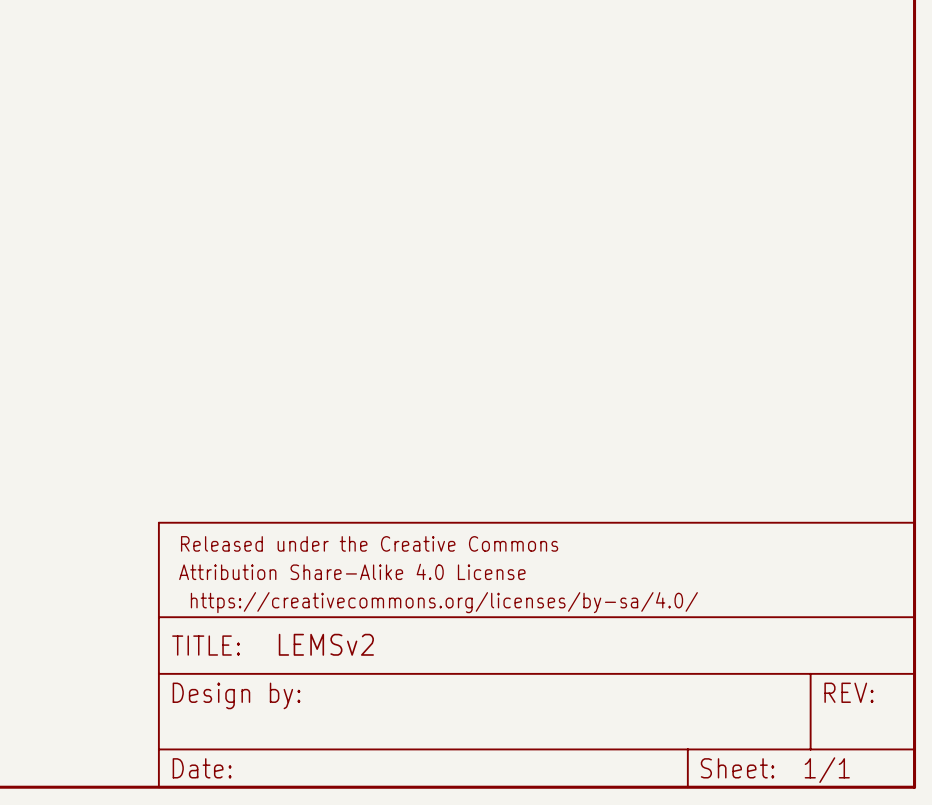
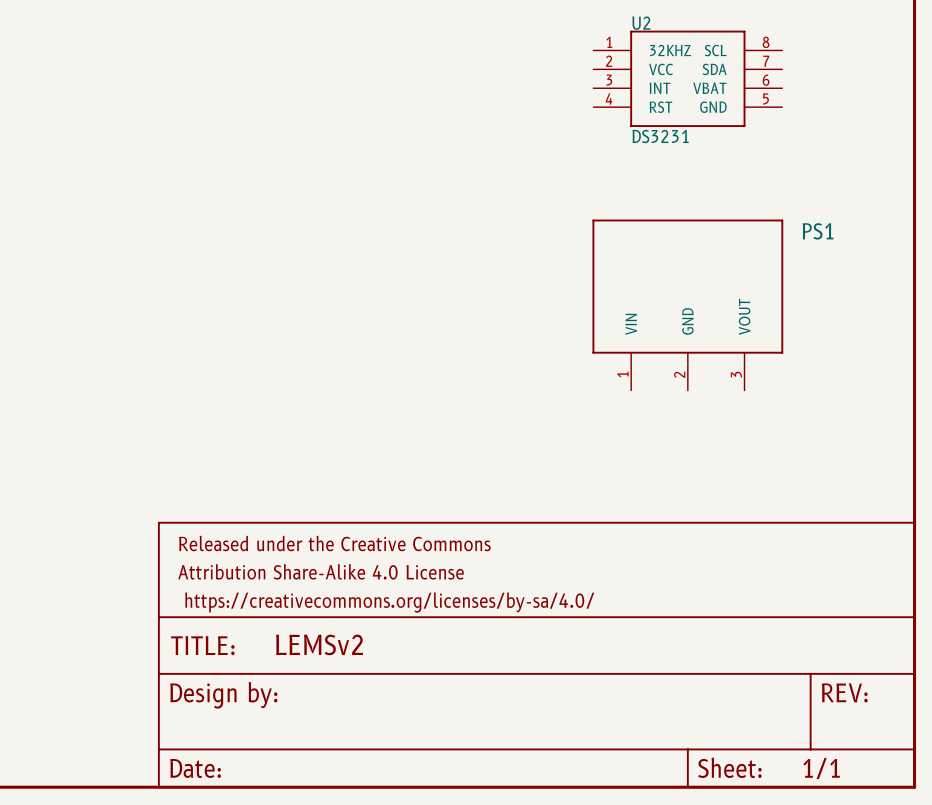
U2: none -> DS3231 (687, 78)
PS1: none -> (687, 305)

